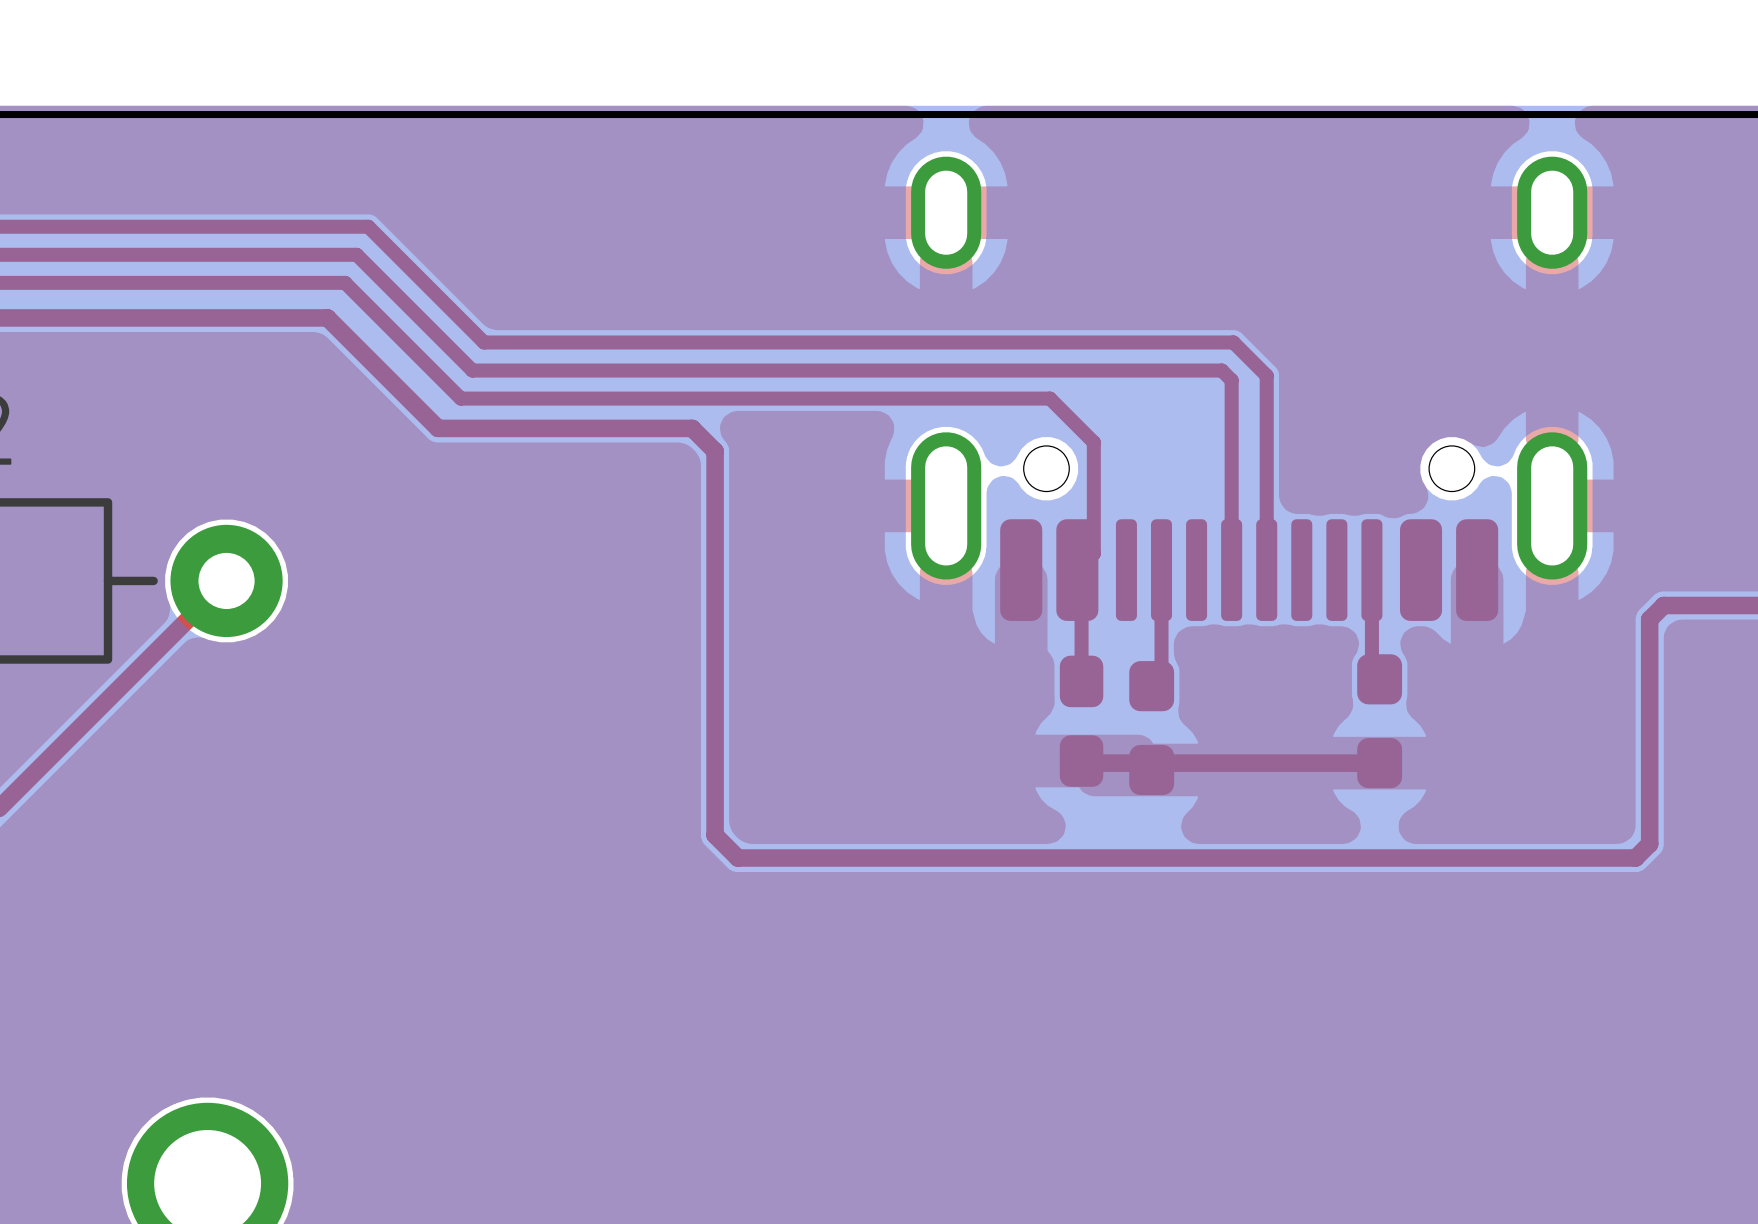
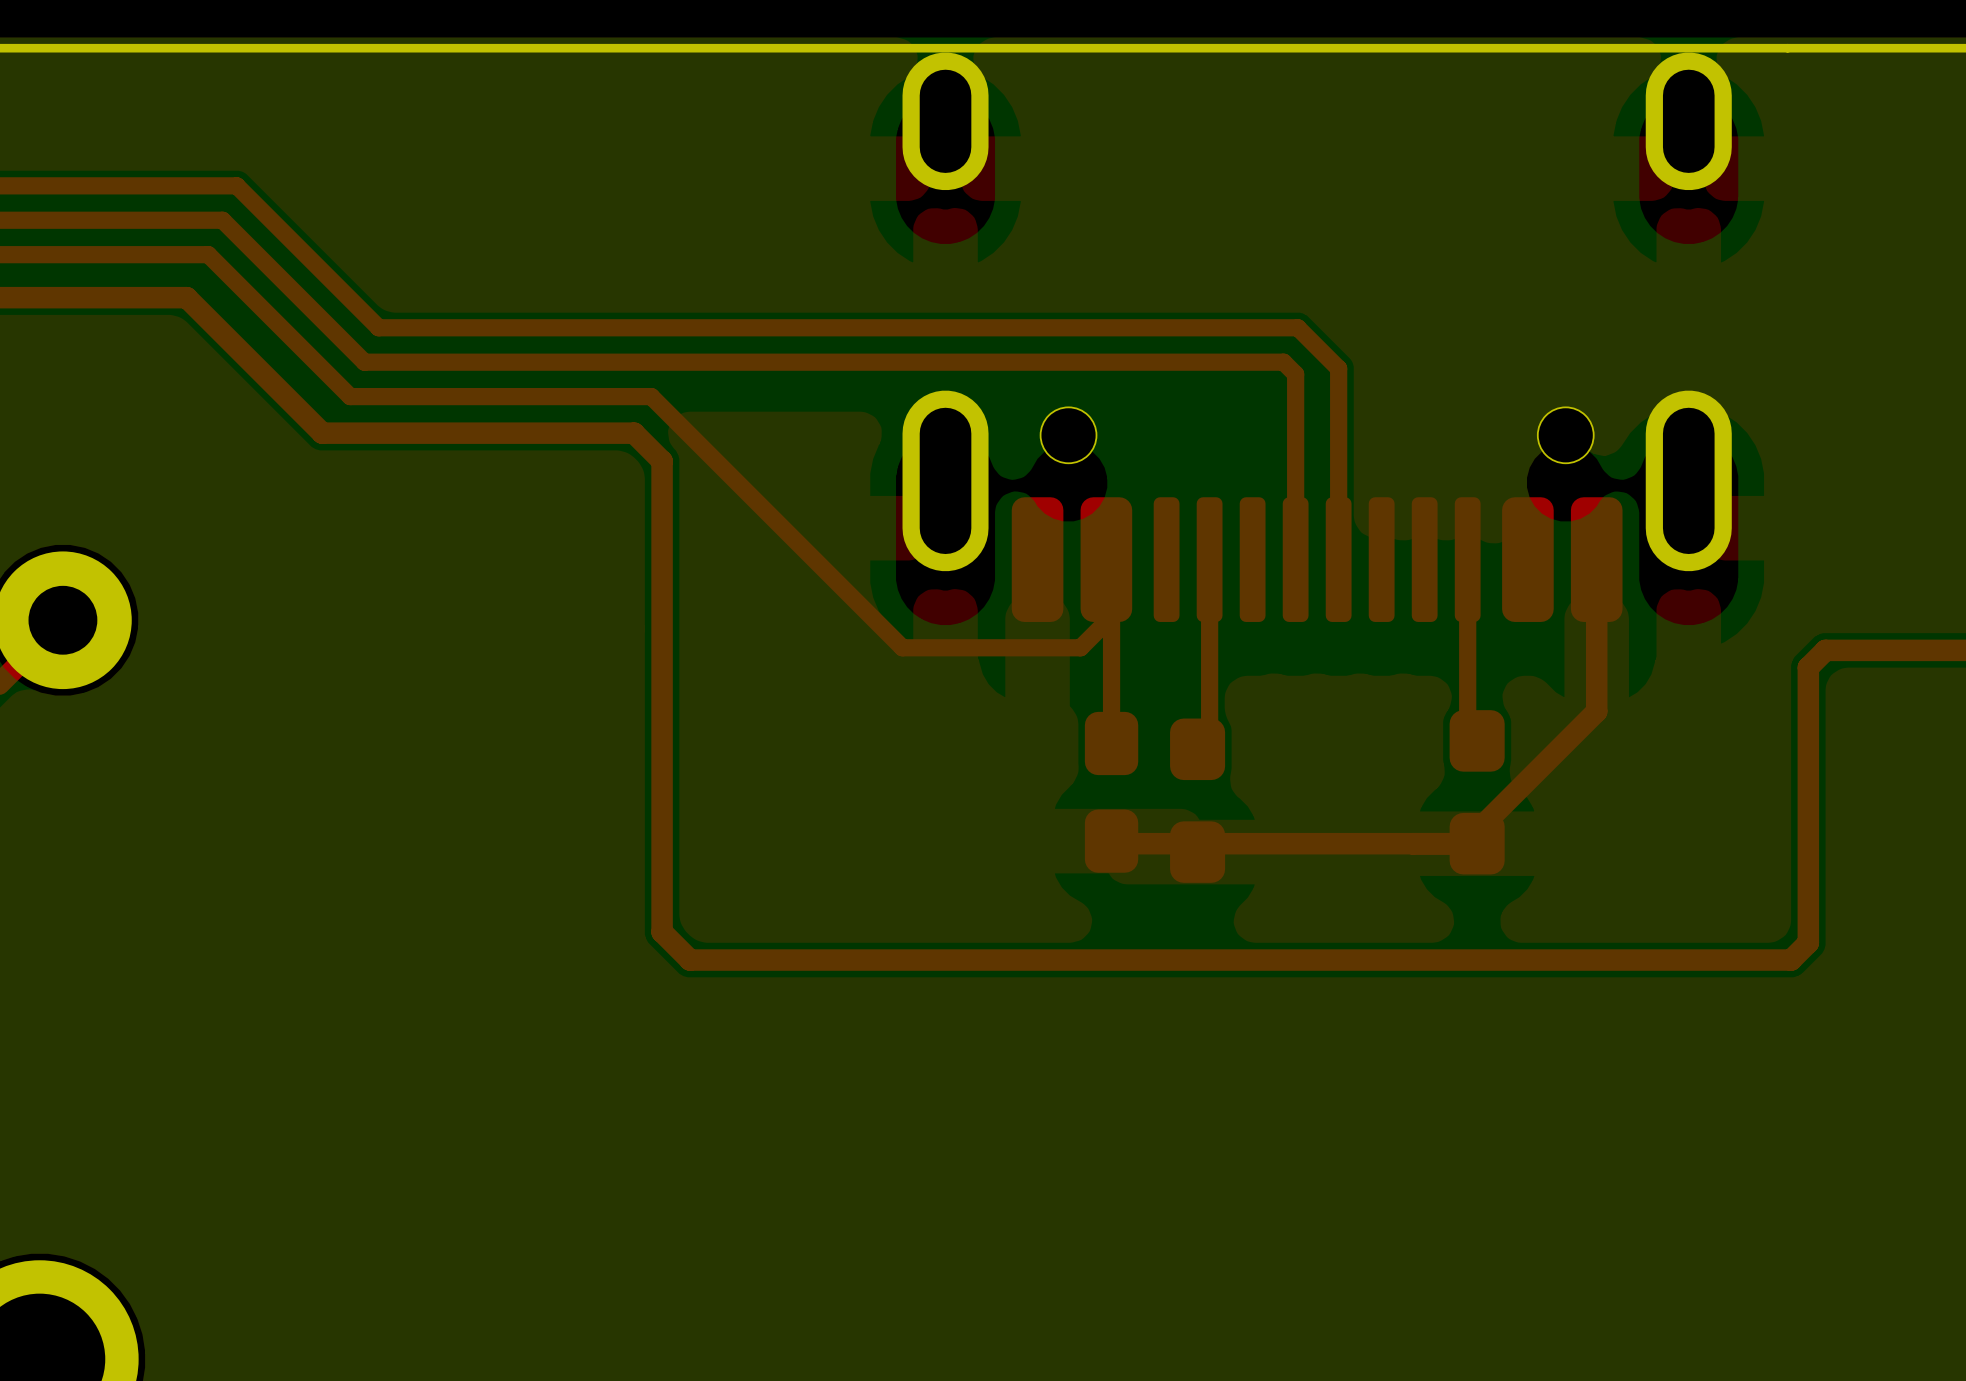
part position: (1249, 388) -> (1317, 337)
top track: (706, 398) (1049, 398) (1093, 442) (1093, 553) (1077, 570) (1081, 574) -> (651, 396) (902, 647) (1080, 647) (1106, 621) (1106, 559)
top track: none -> (1596, 559) (1596, 711) (1464, 843)

